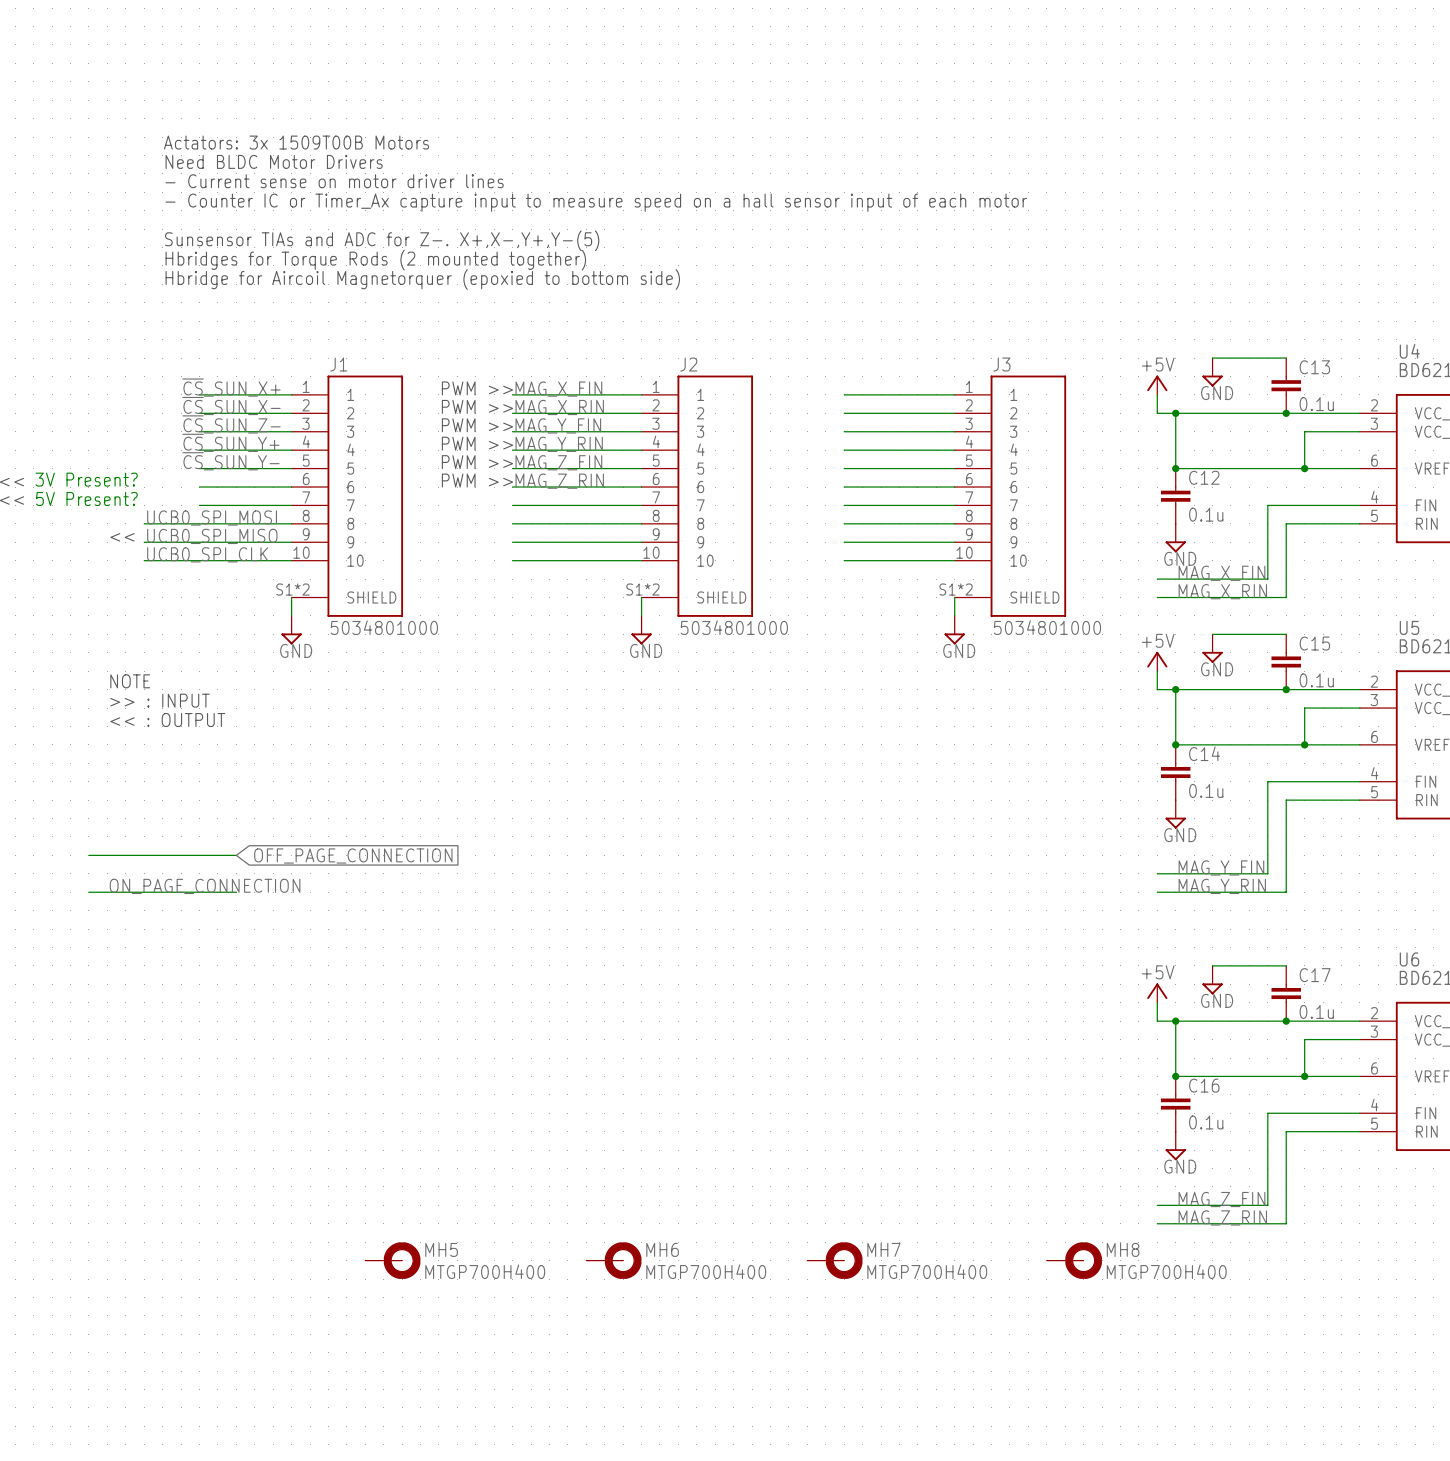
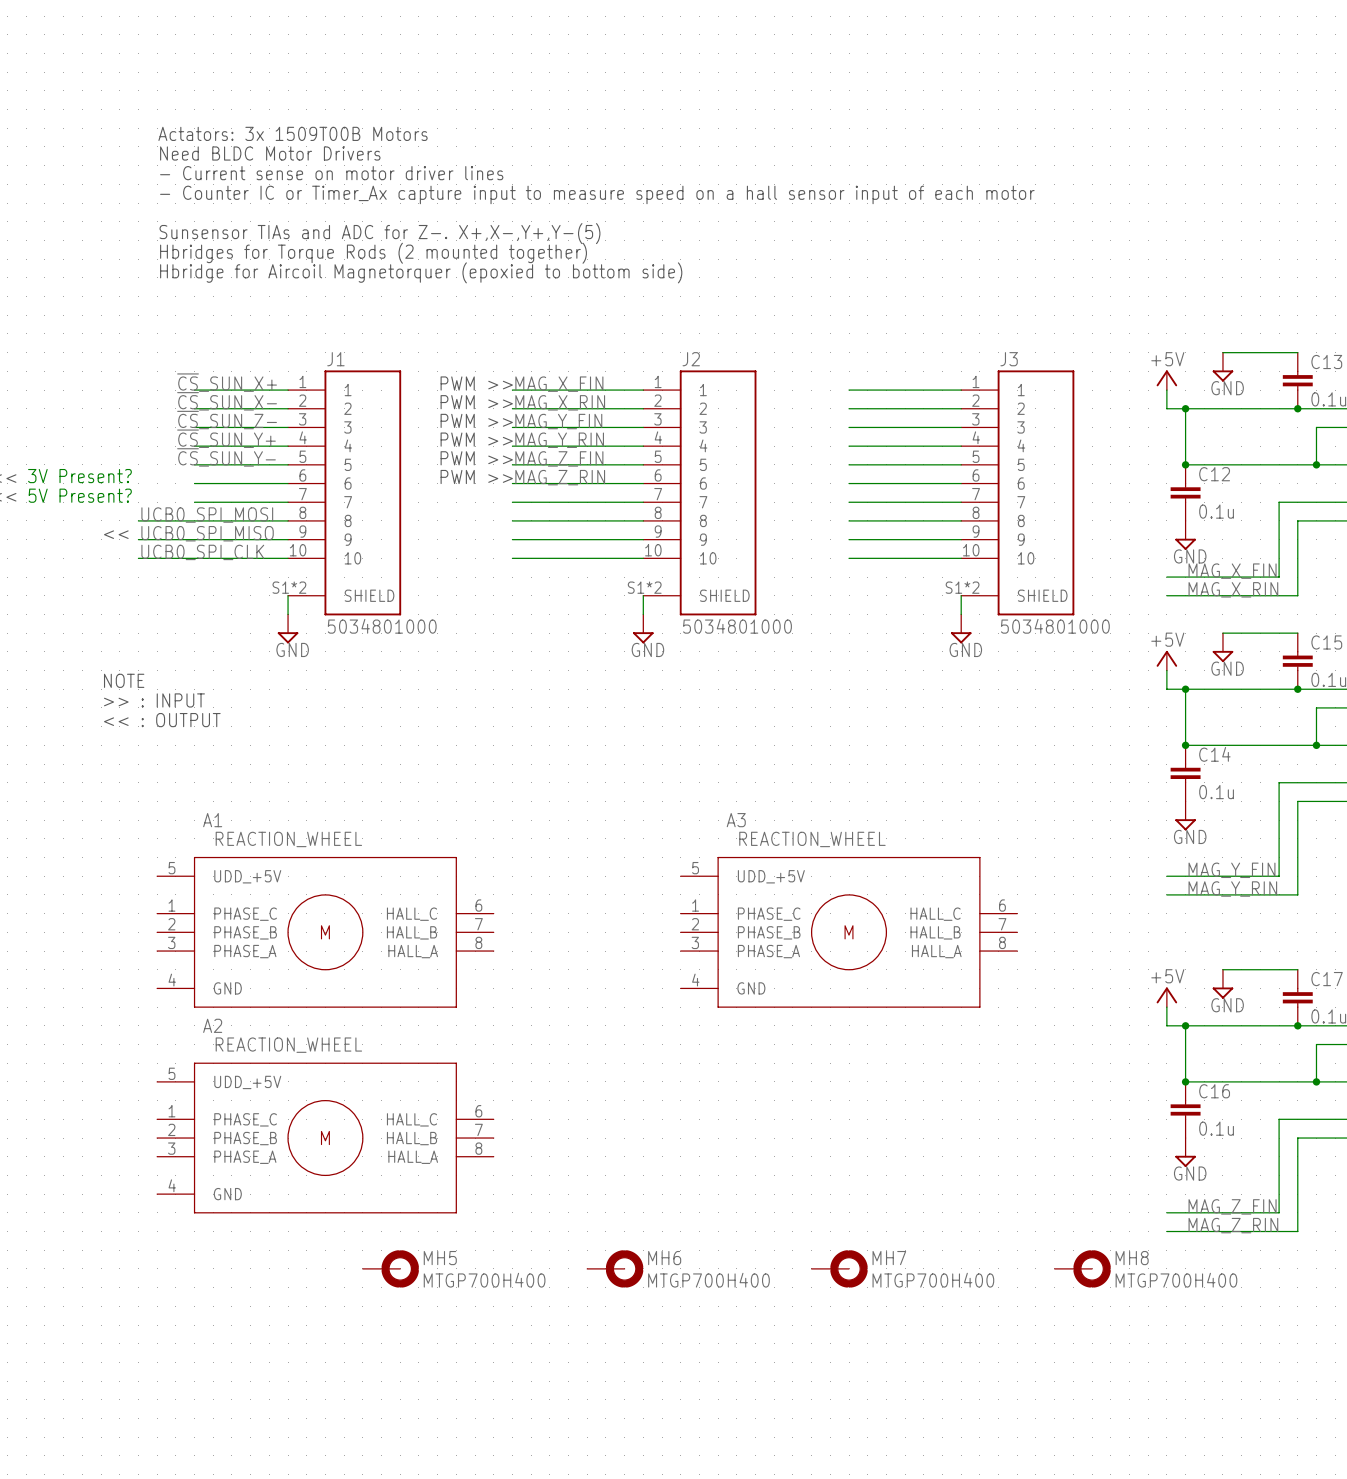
wire: (88, 855) (236, 855) -> none
global label: OFF_PAGE_CONNECTION (353, 856) -> none
label: ON_PAGE_CONNECTION (205, 886) -> none
wire: (88, 892) (236, 892) -> none
A1: none -> REACTION_WHEEL (325, 932)
A3: none -> REACTION_WHEEL (849, 932)
A2: none -> REACTION_WHEEL (325, 1138)

